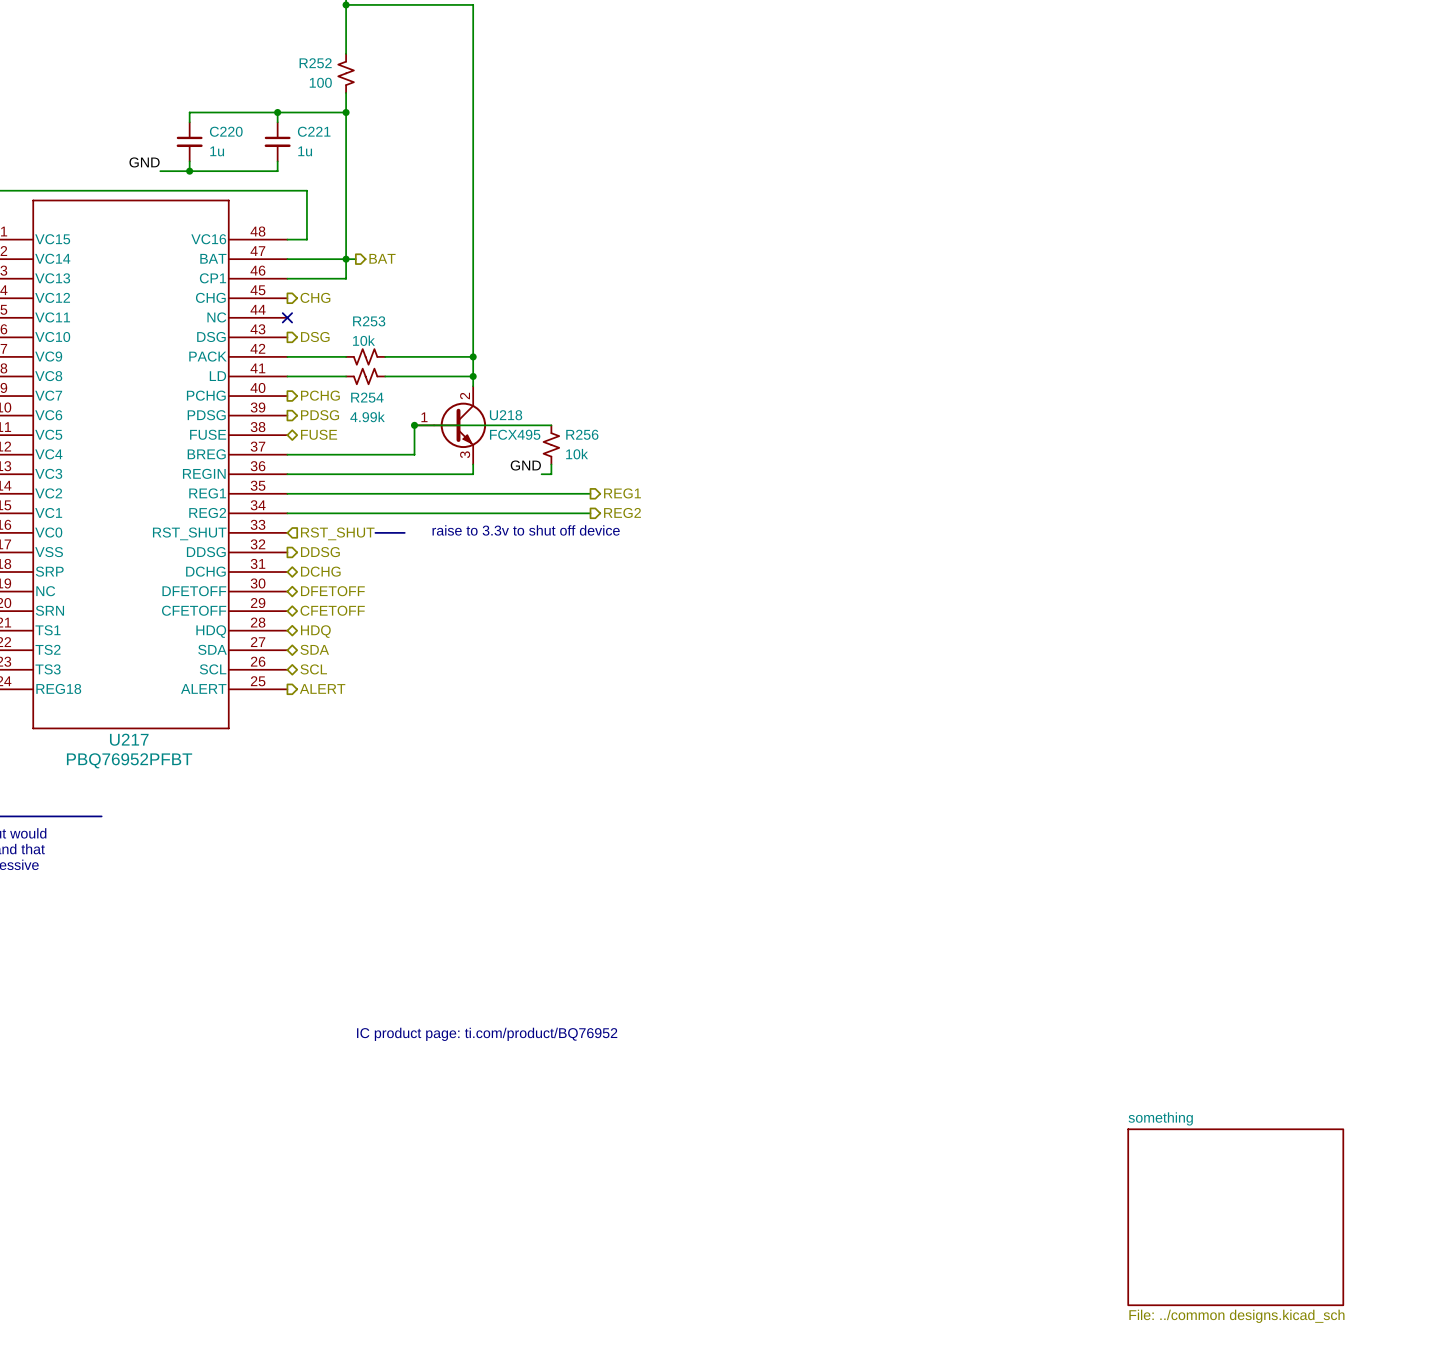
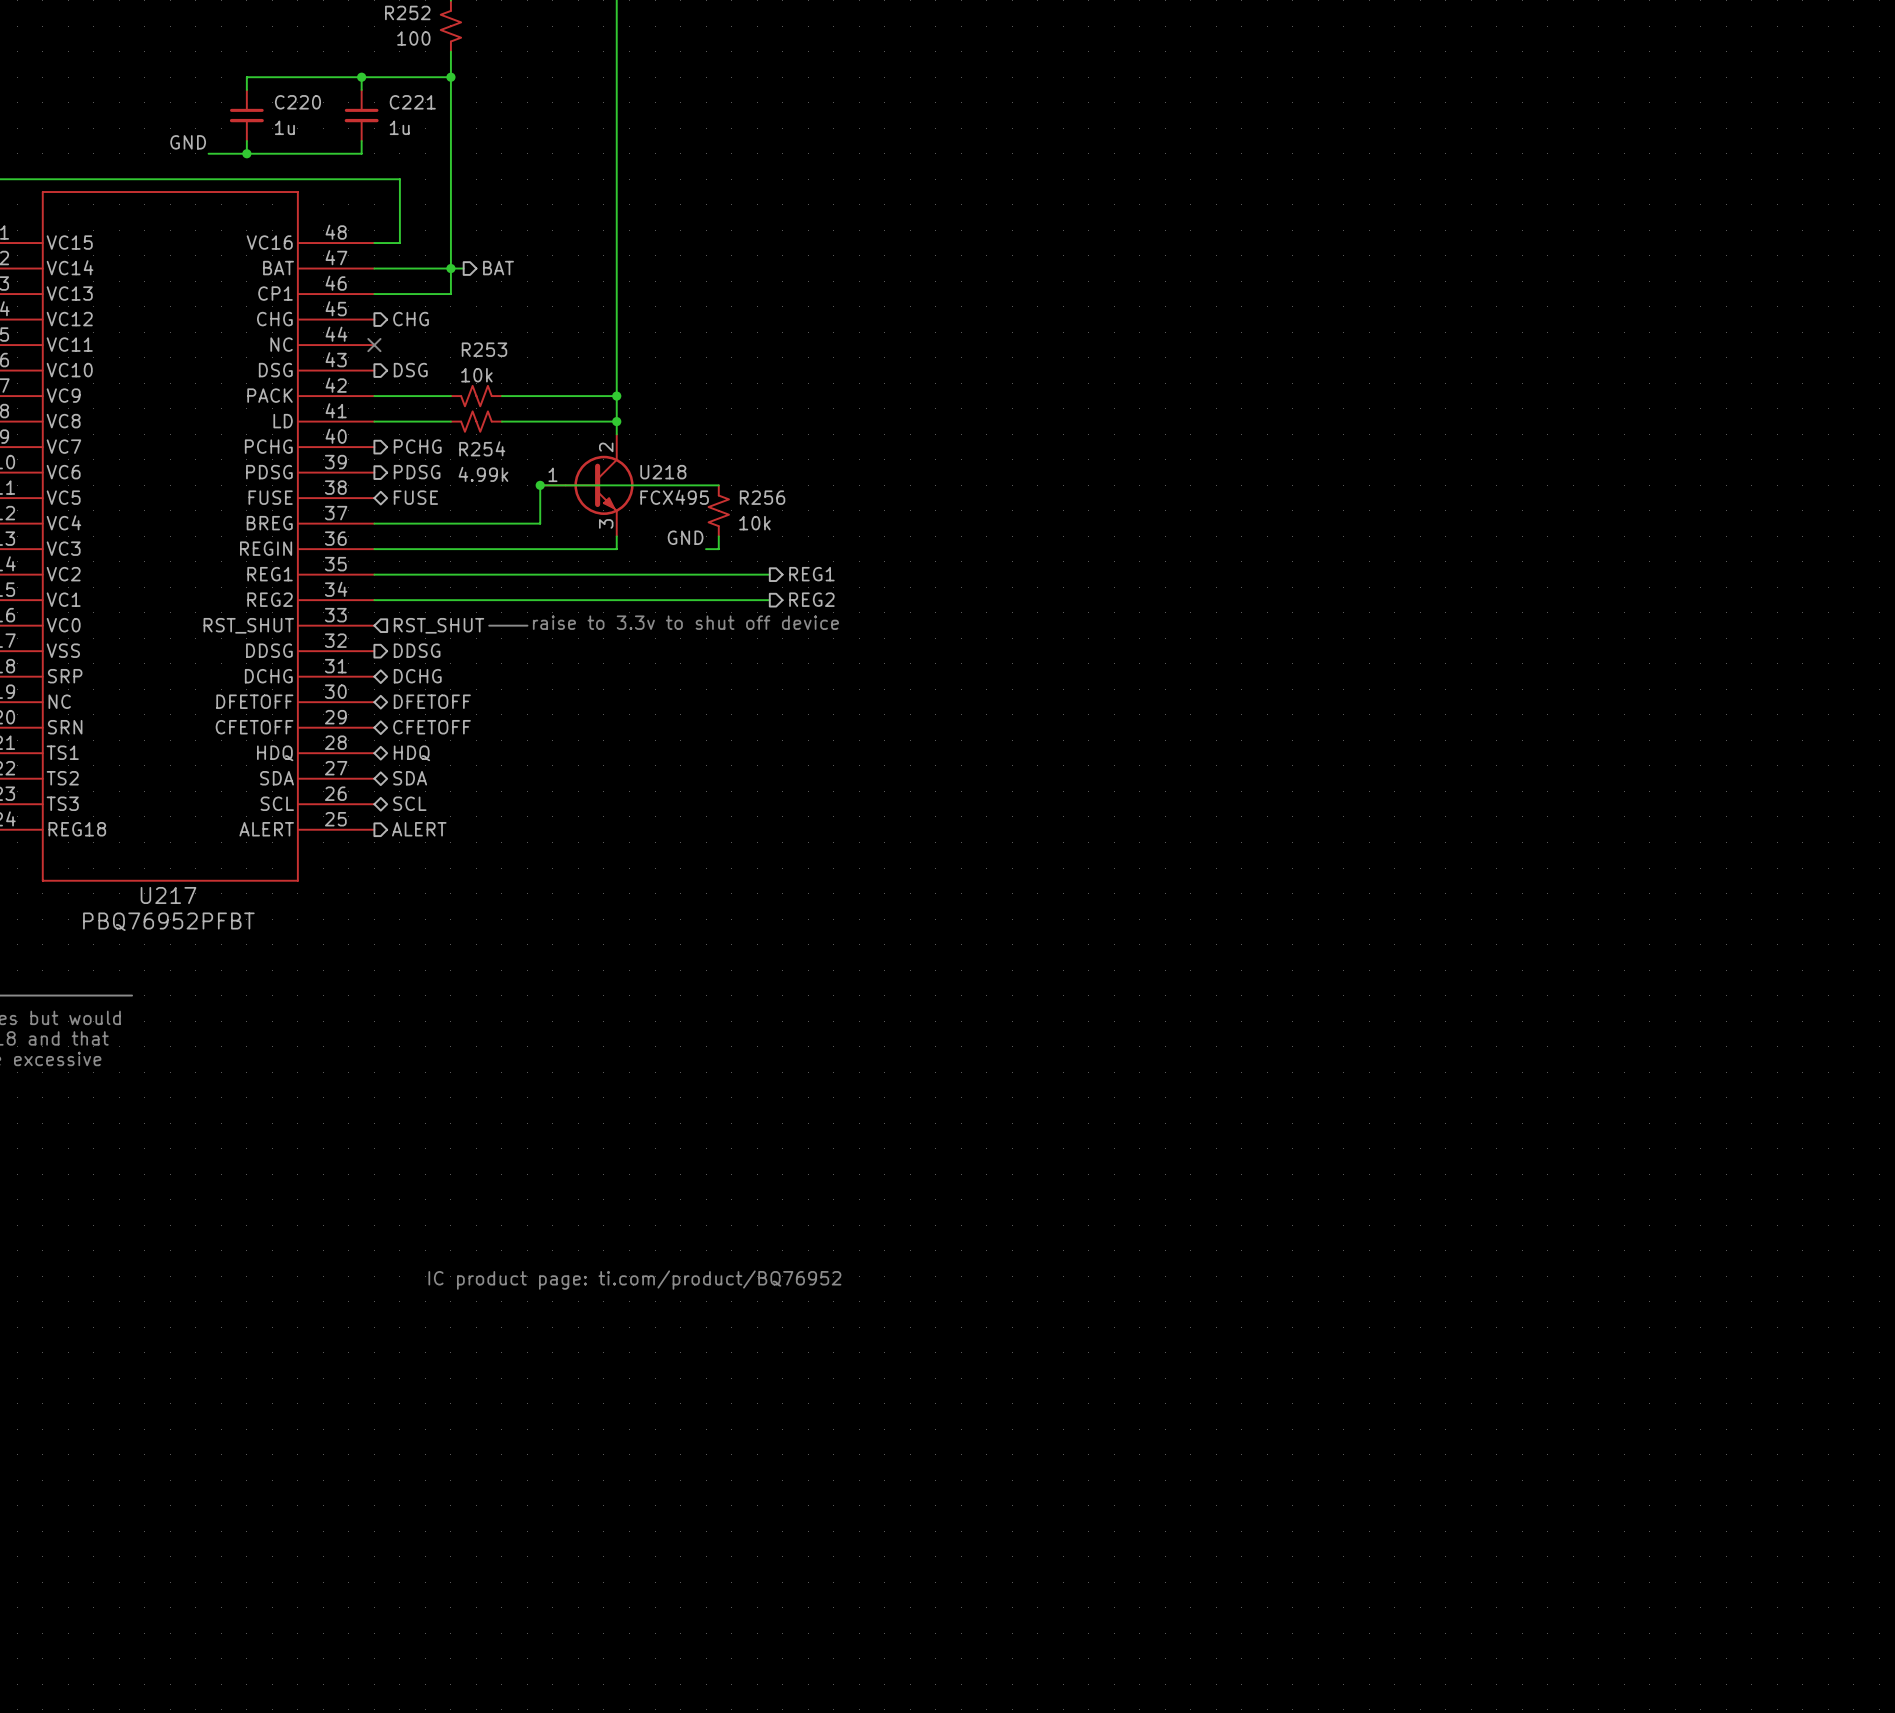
sheet something: File: ../common designs.kicad_sch (1235, 1217) -> none

